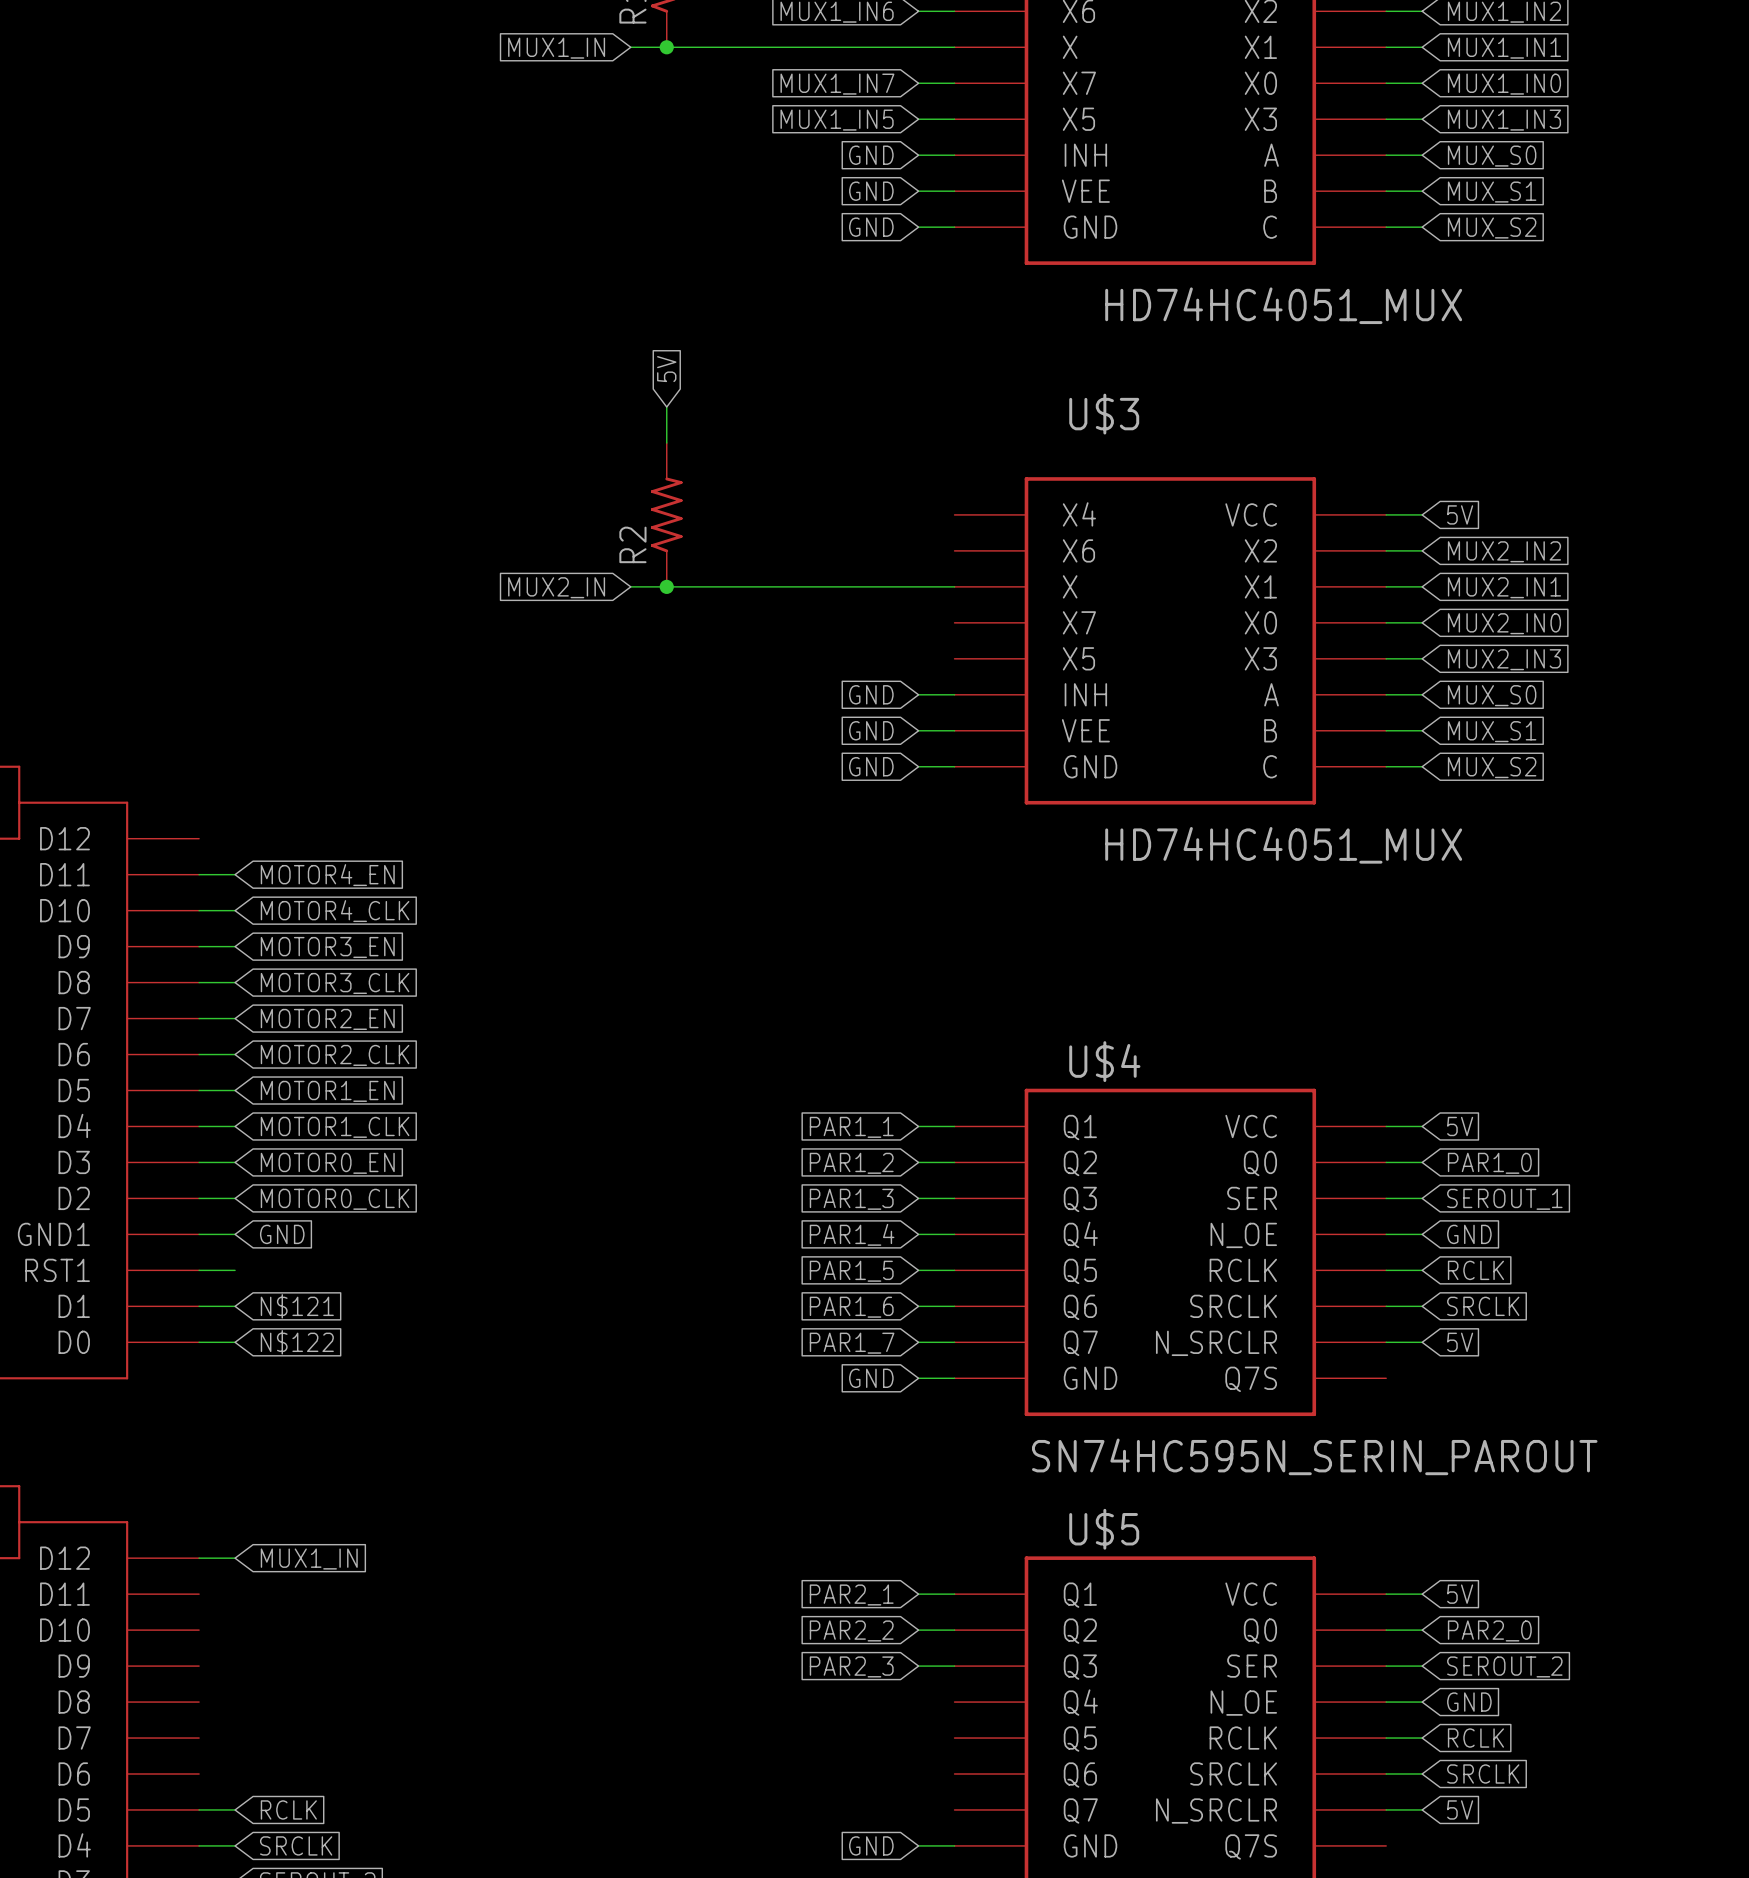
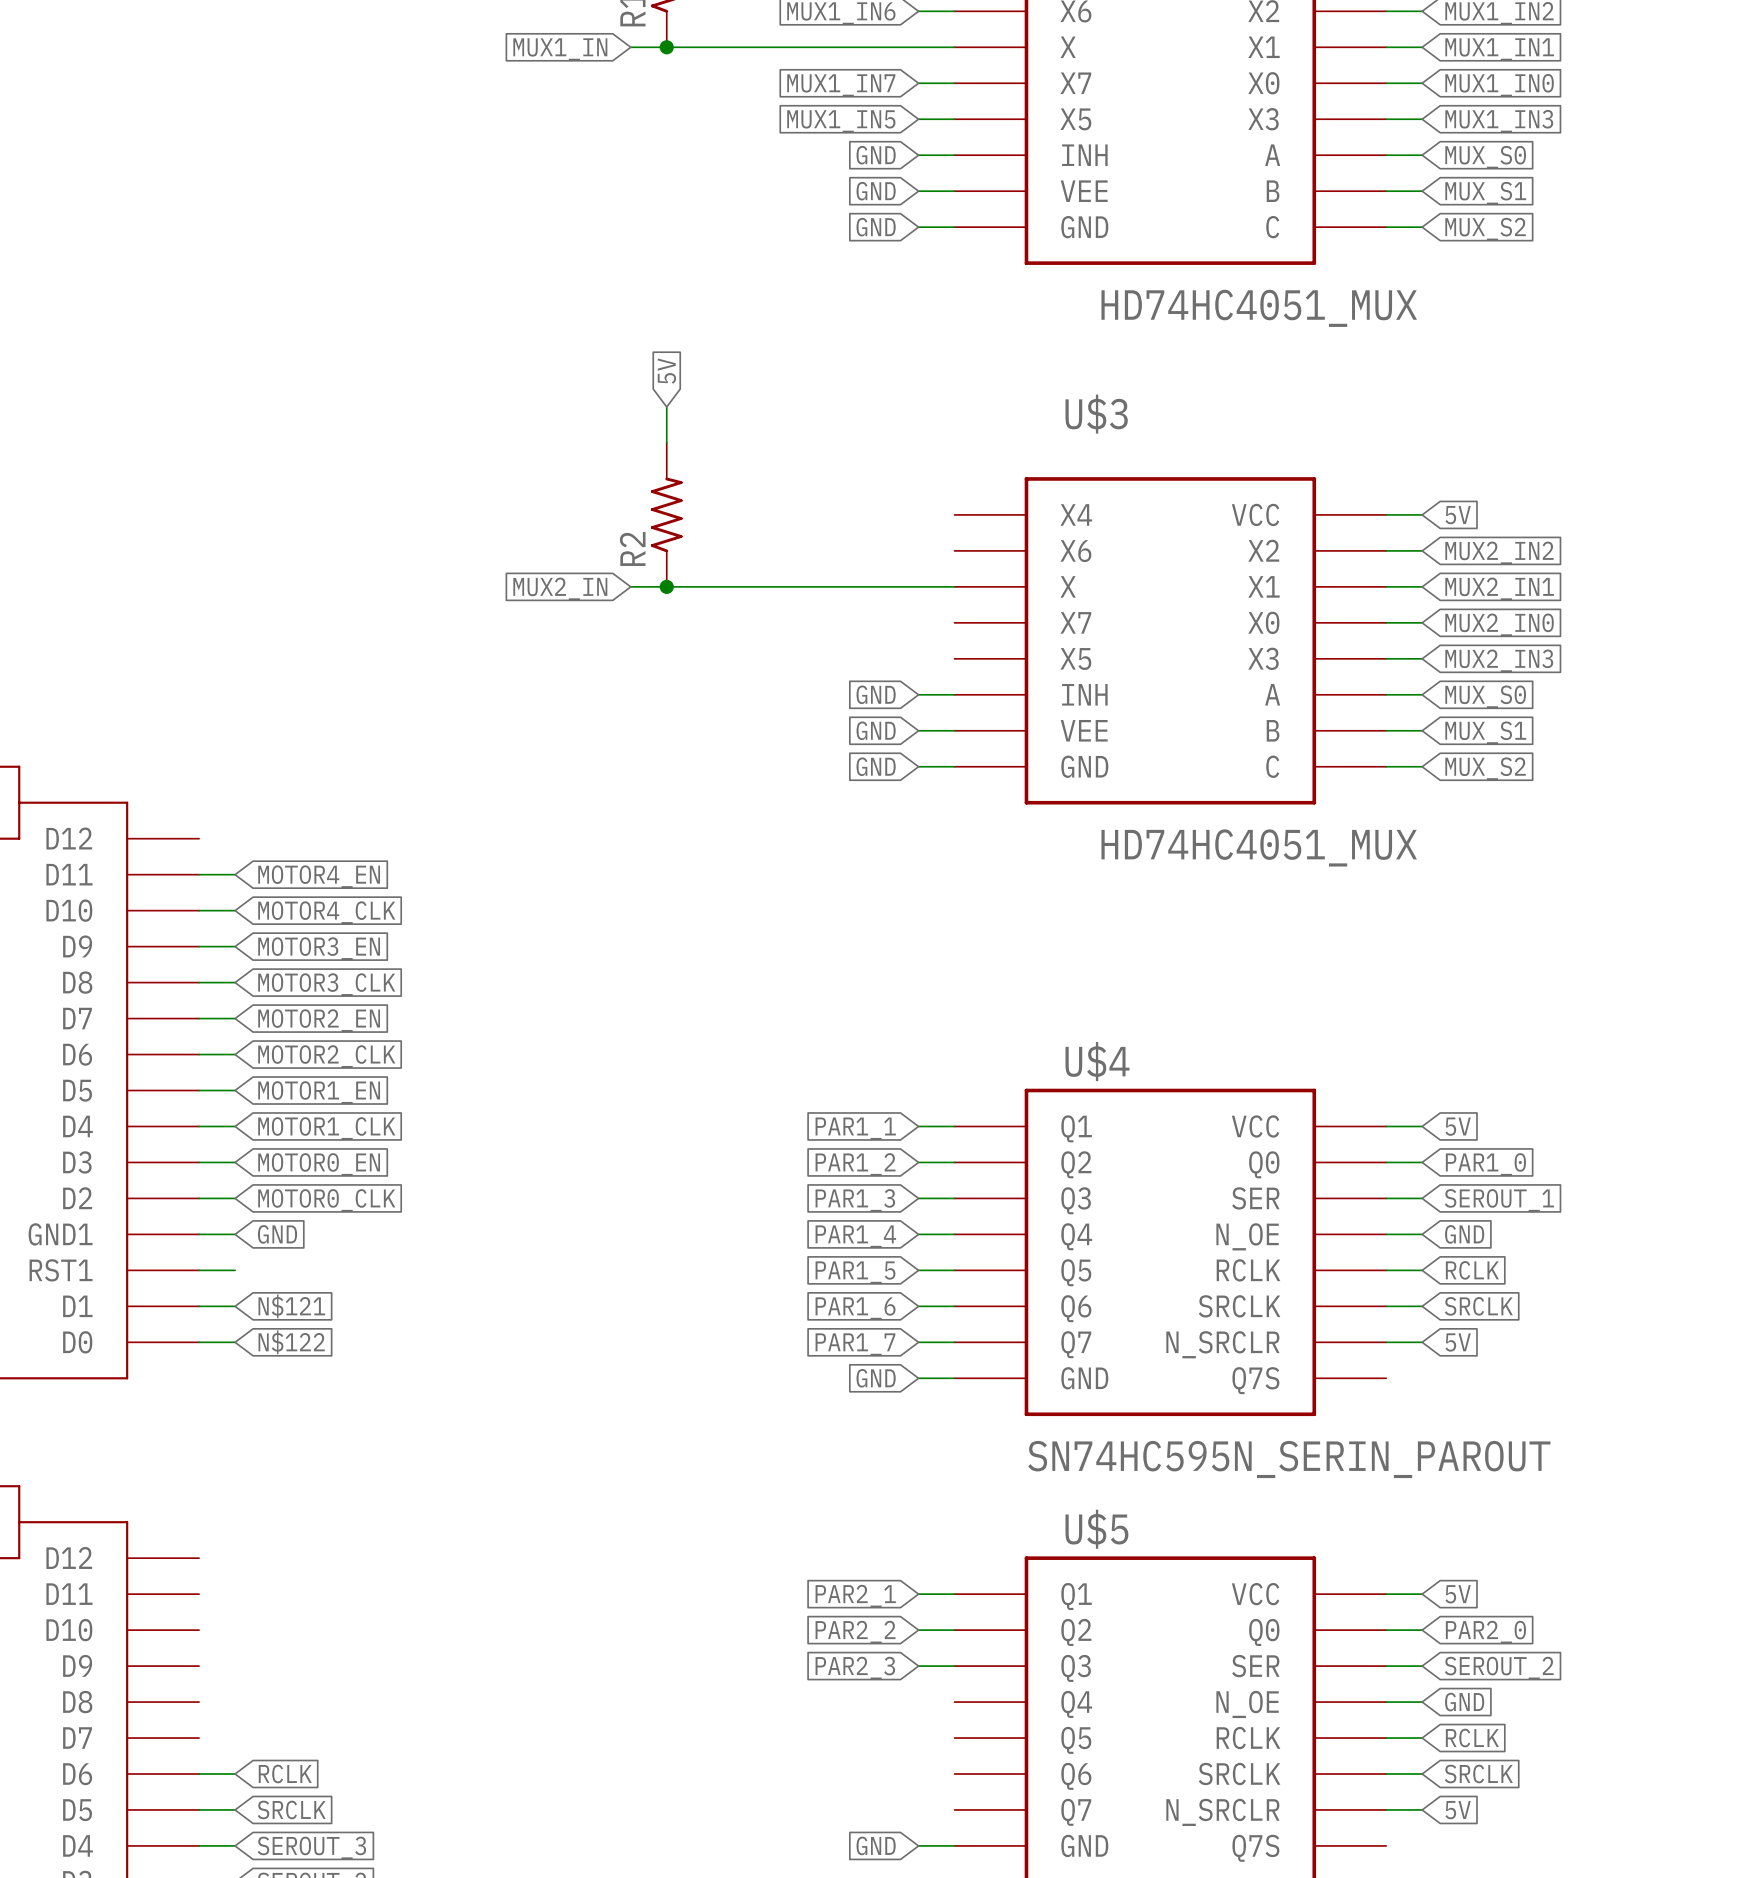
wire: (199, 1558) (235, 1558) -> (199, 1774) (235, 1774)
global label: MUX1_IN (309, 1559) -> none
global label: none -> RCLK (285, 1774)
global label: RCLK (288, 1809) -> SRCLK (291, 1809)
global label: SRCLK (296, 1845) -> SEROUT_3 (311, 1847)

